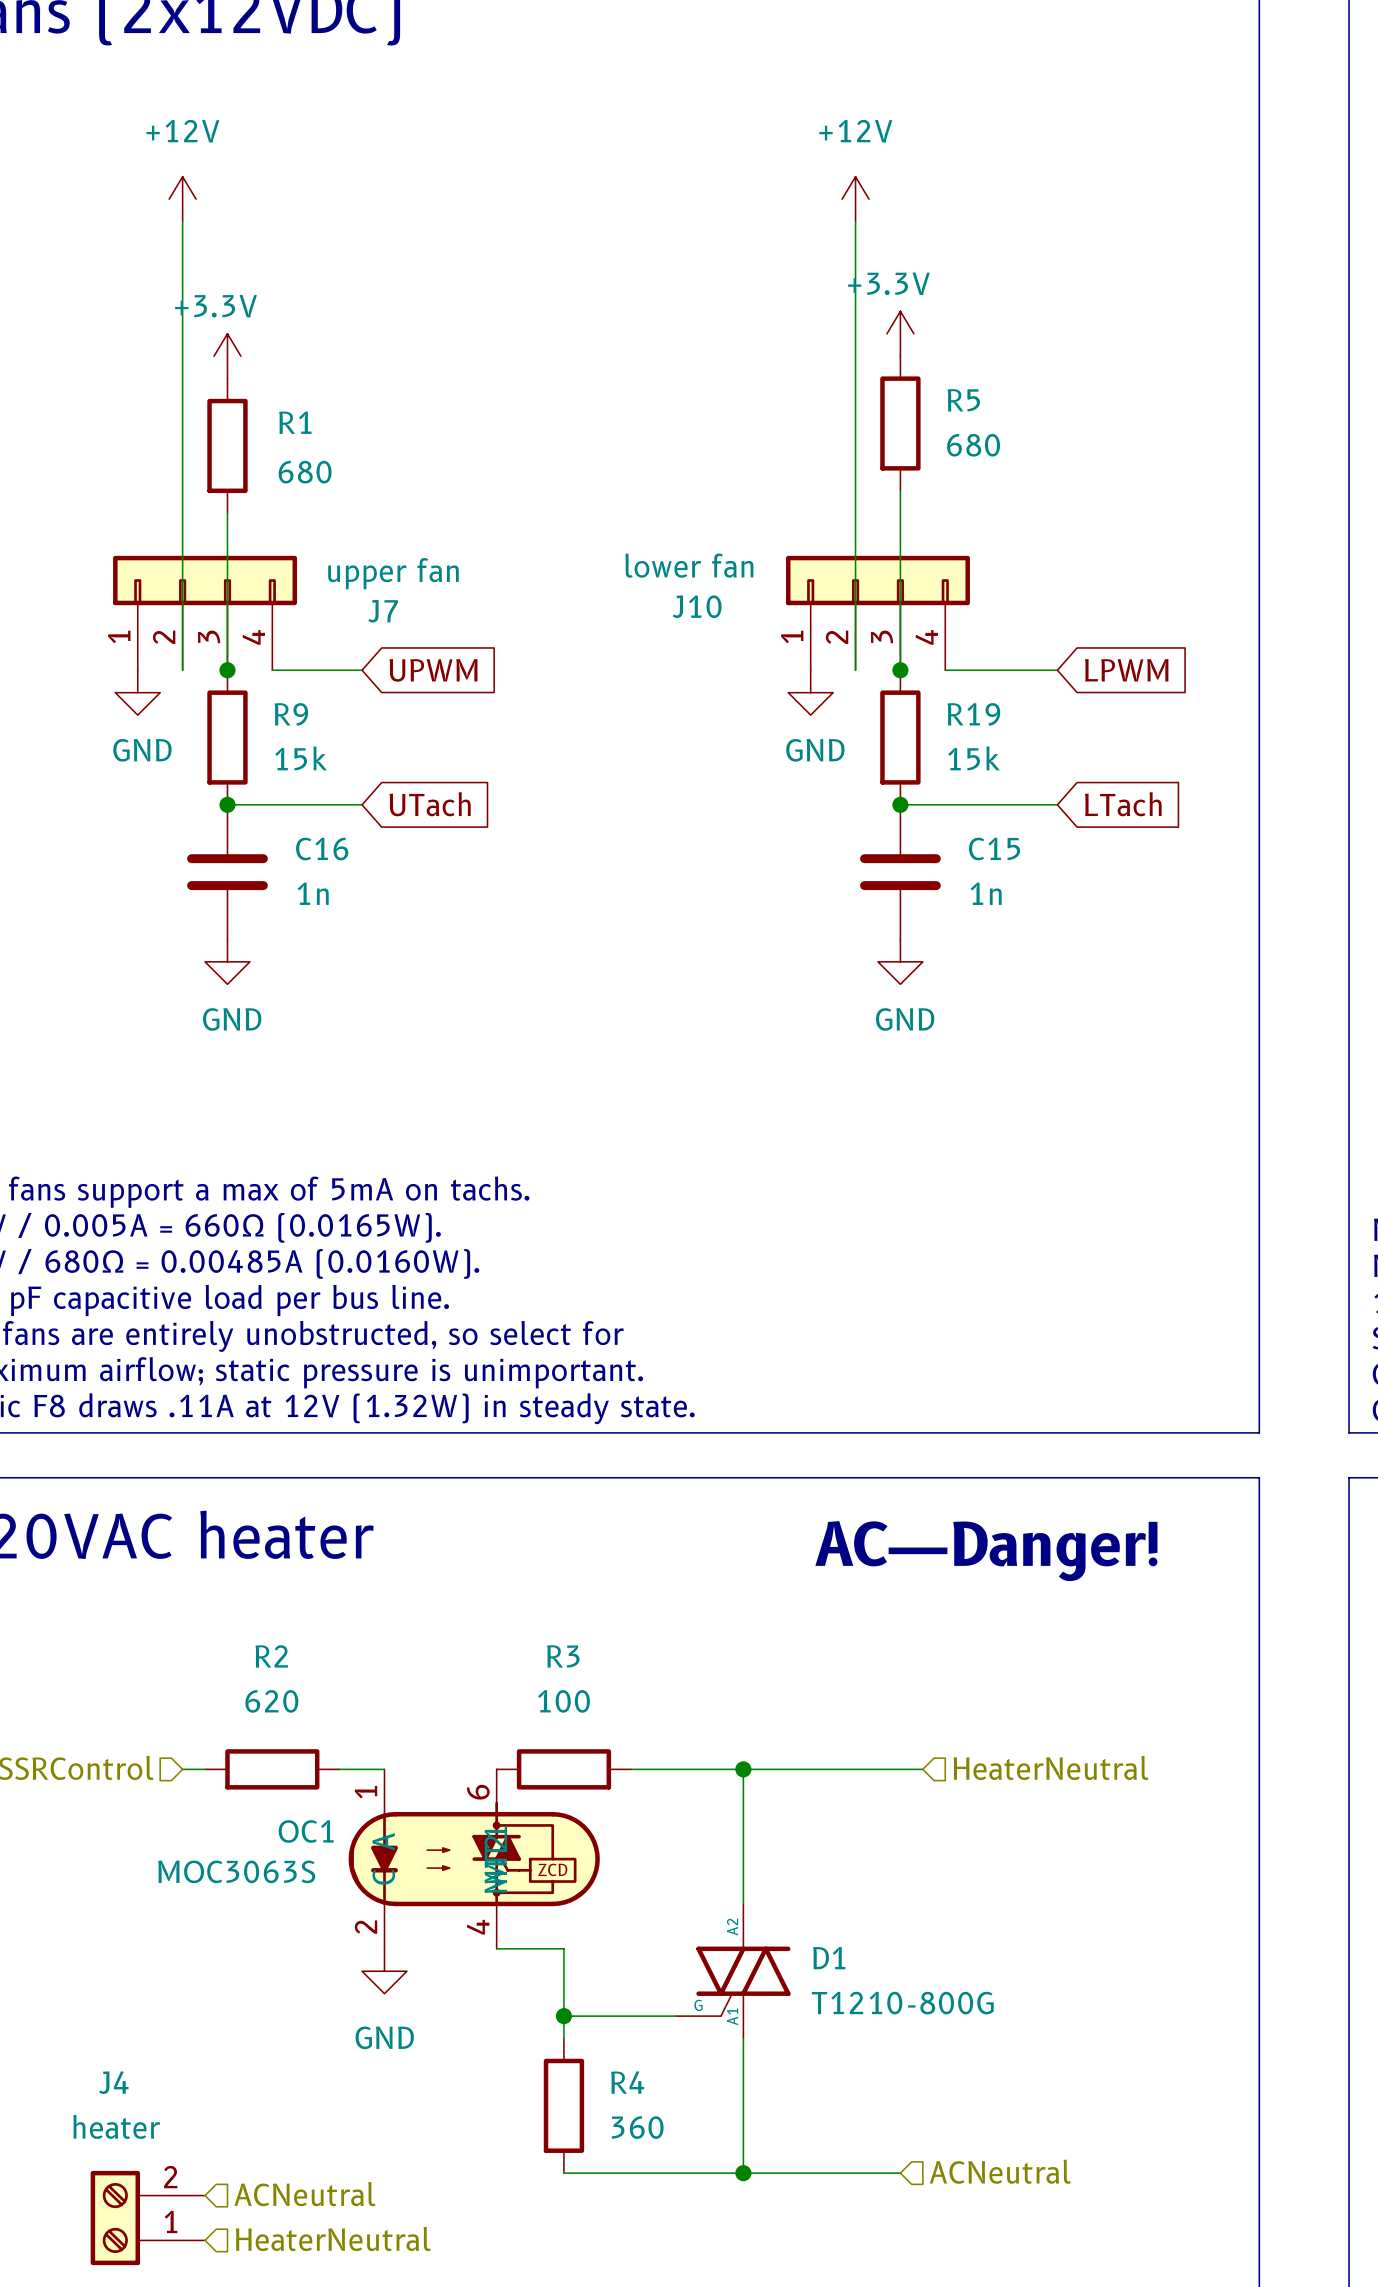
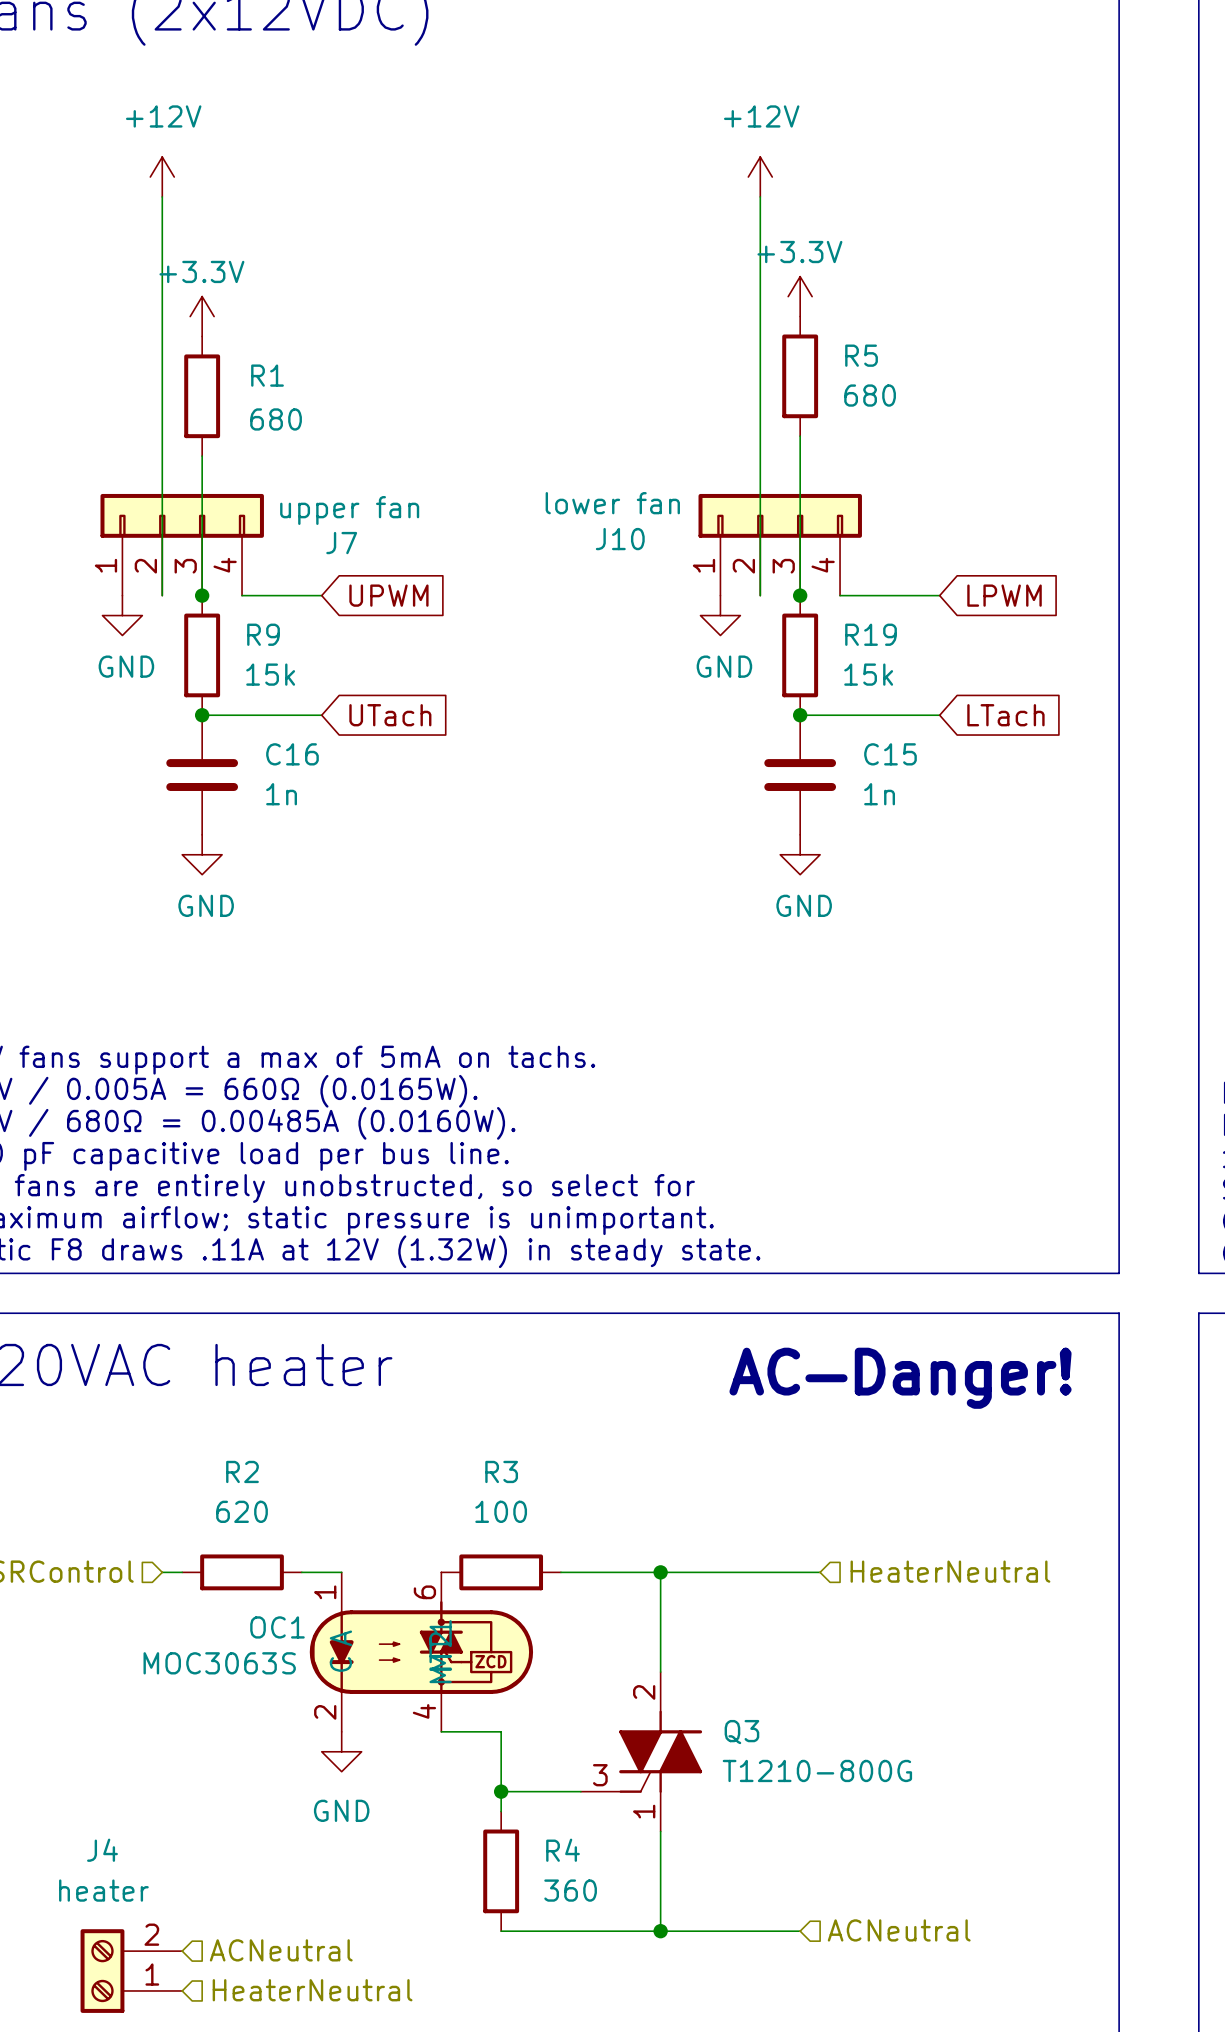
Q3: none -> T1210-800G (641, 1751)
D1: T1210-800G (733, 1971) -> none

